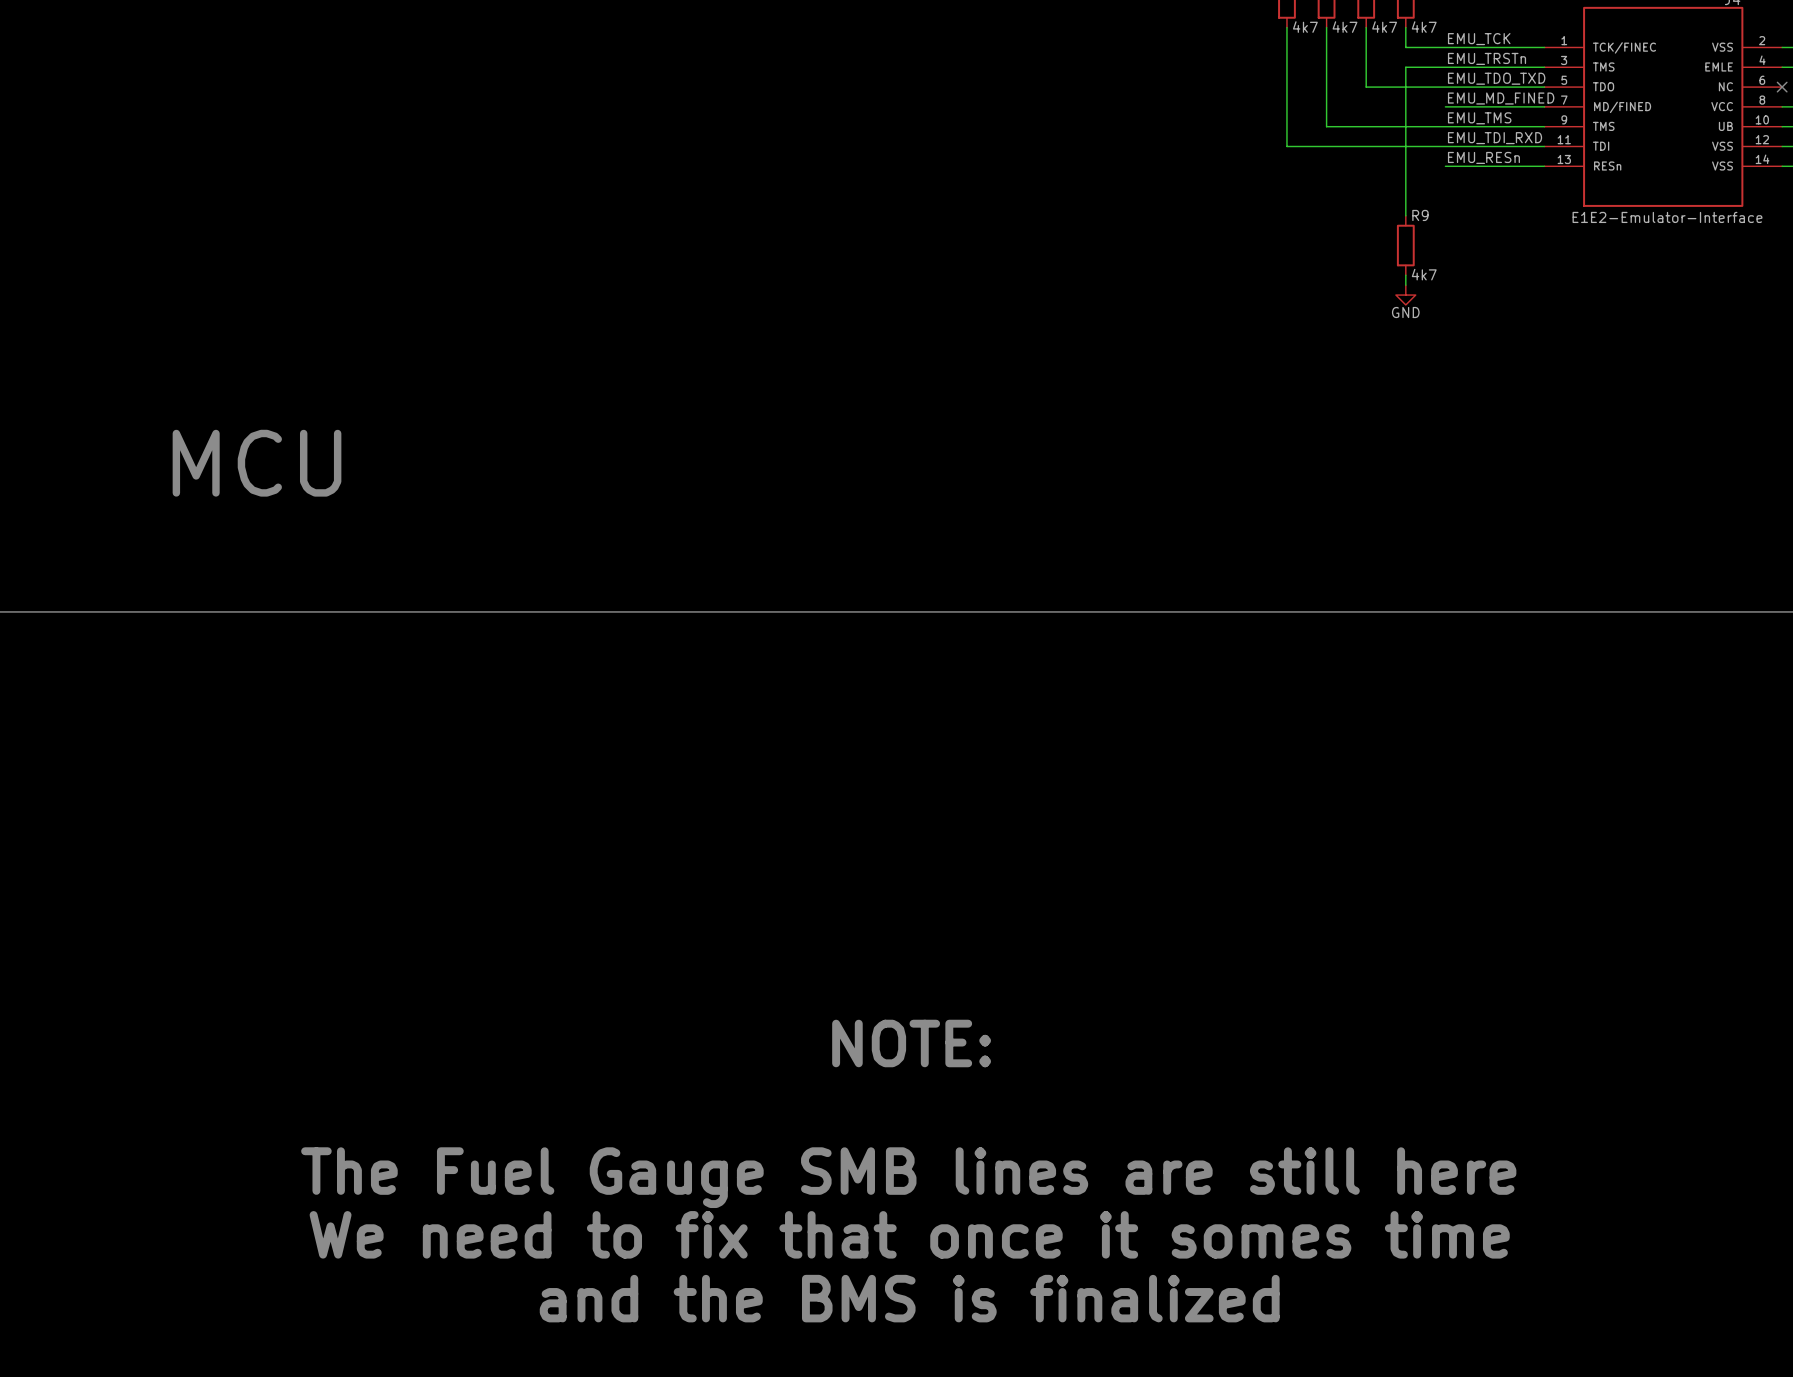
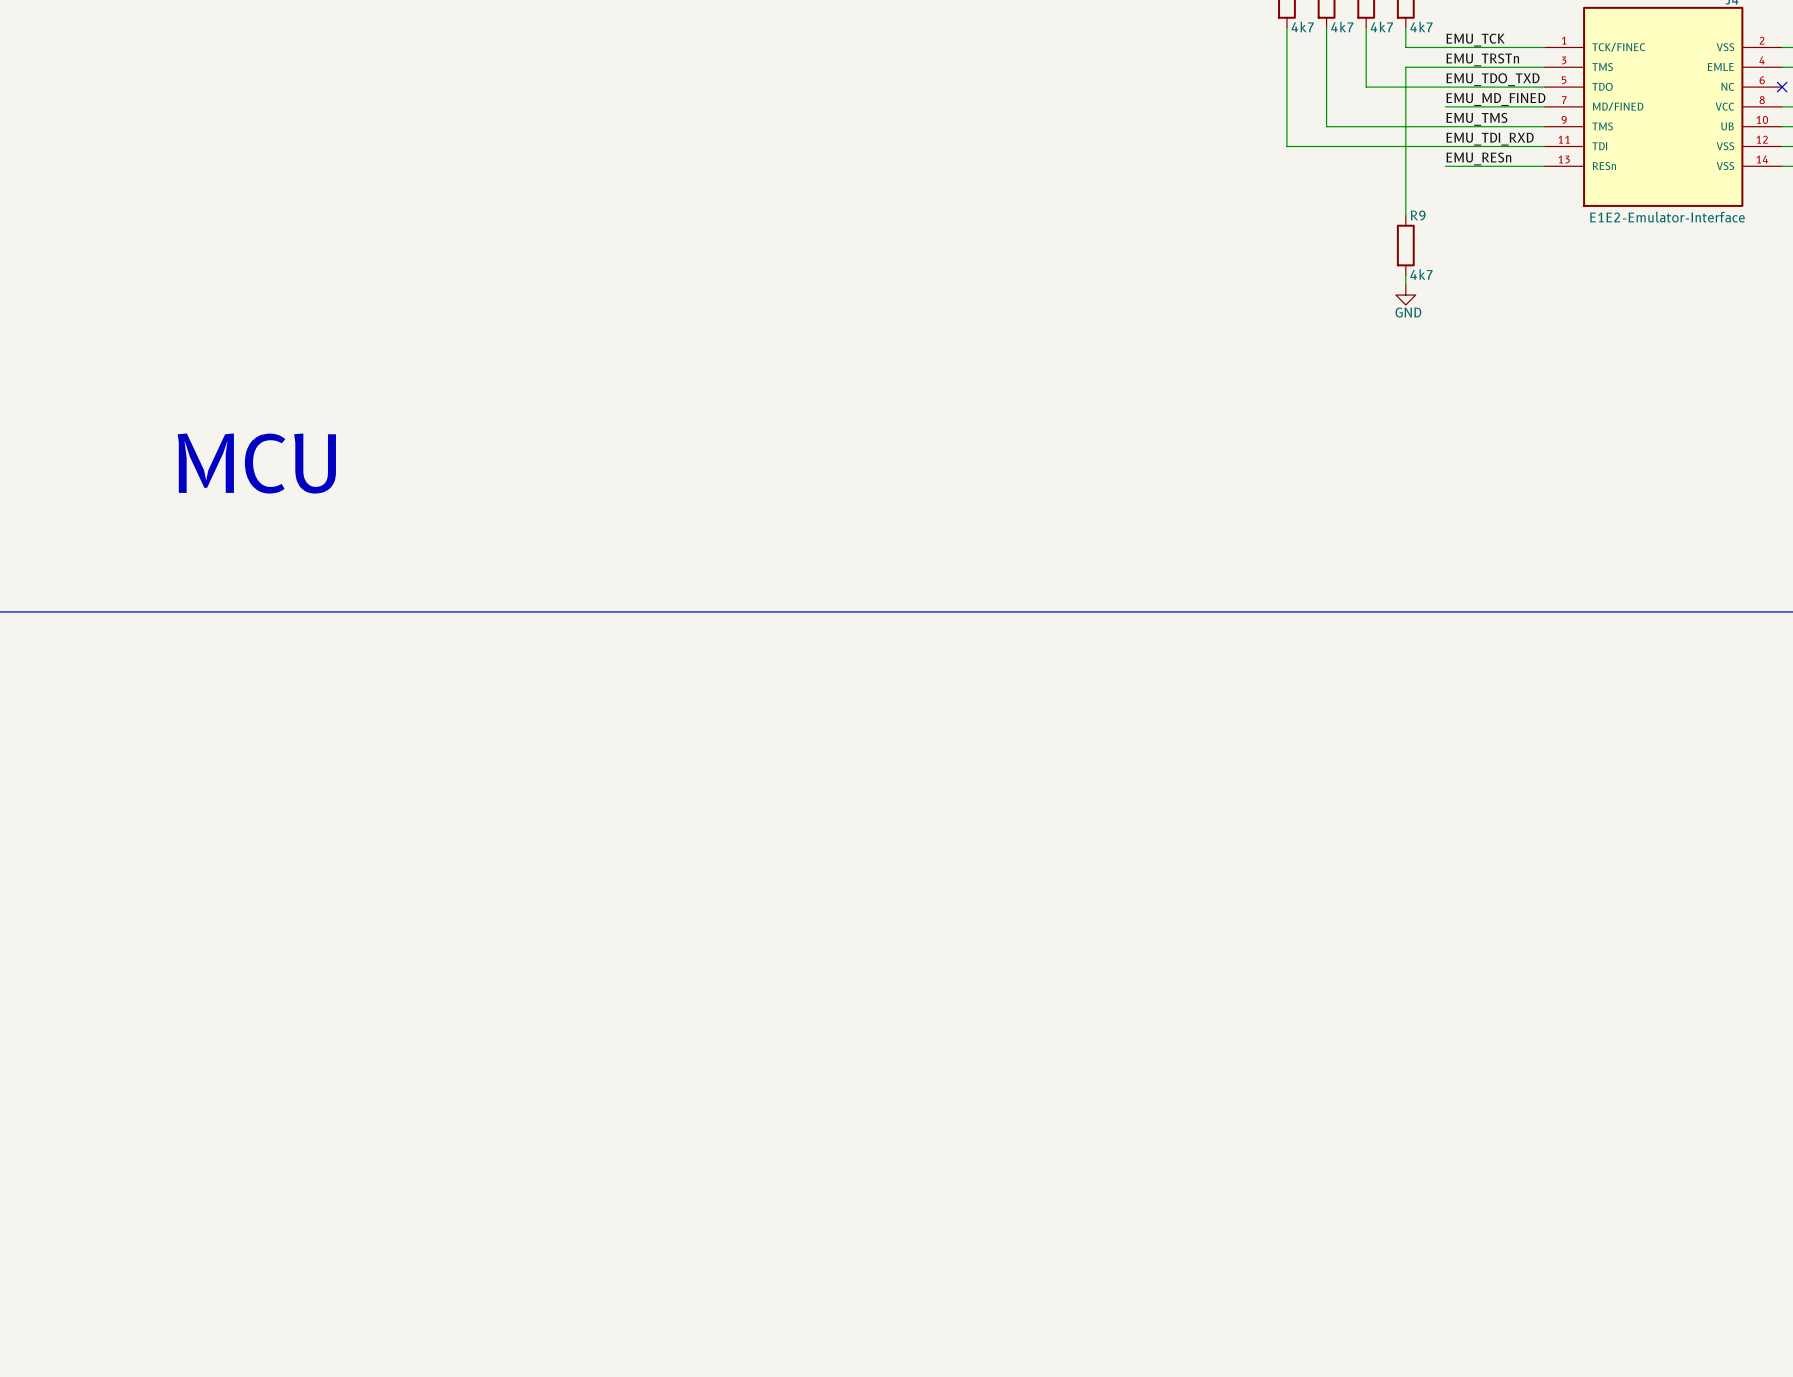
text: NOTE: (911, 1043) -> none
text: The Fuel Gauge SMB lines are still here (908, 1177) -> none
text: We need to fix that once it somes time (909, 1234) -> none
text: and the BMS is finalized (909, 1298) -> none

